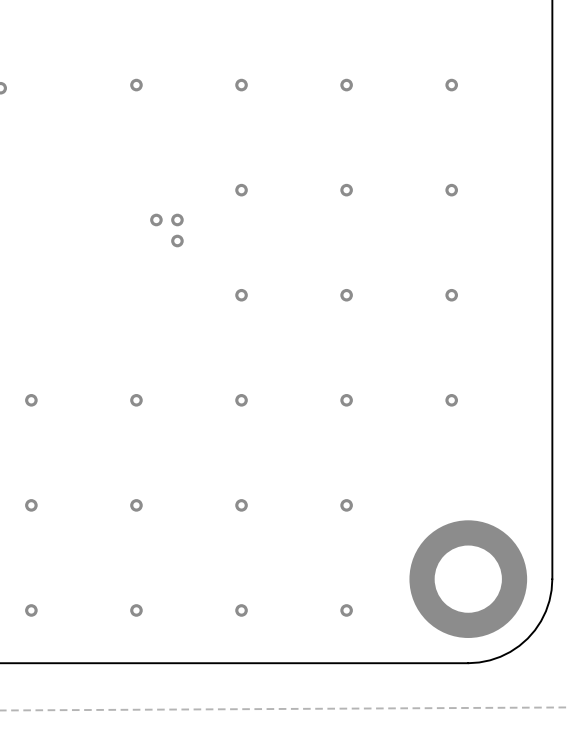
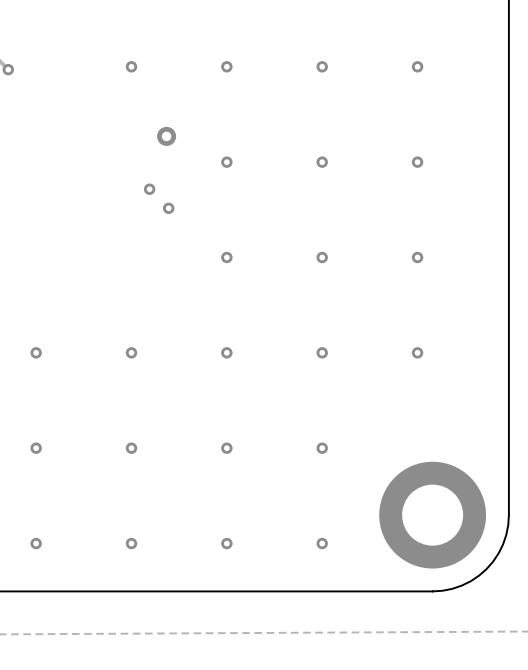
via: none -> (166, 136)
via: (177, 219) -> none

